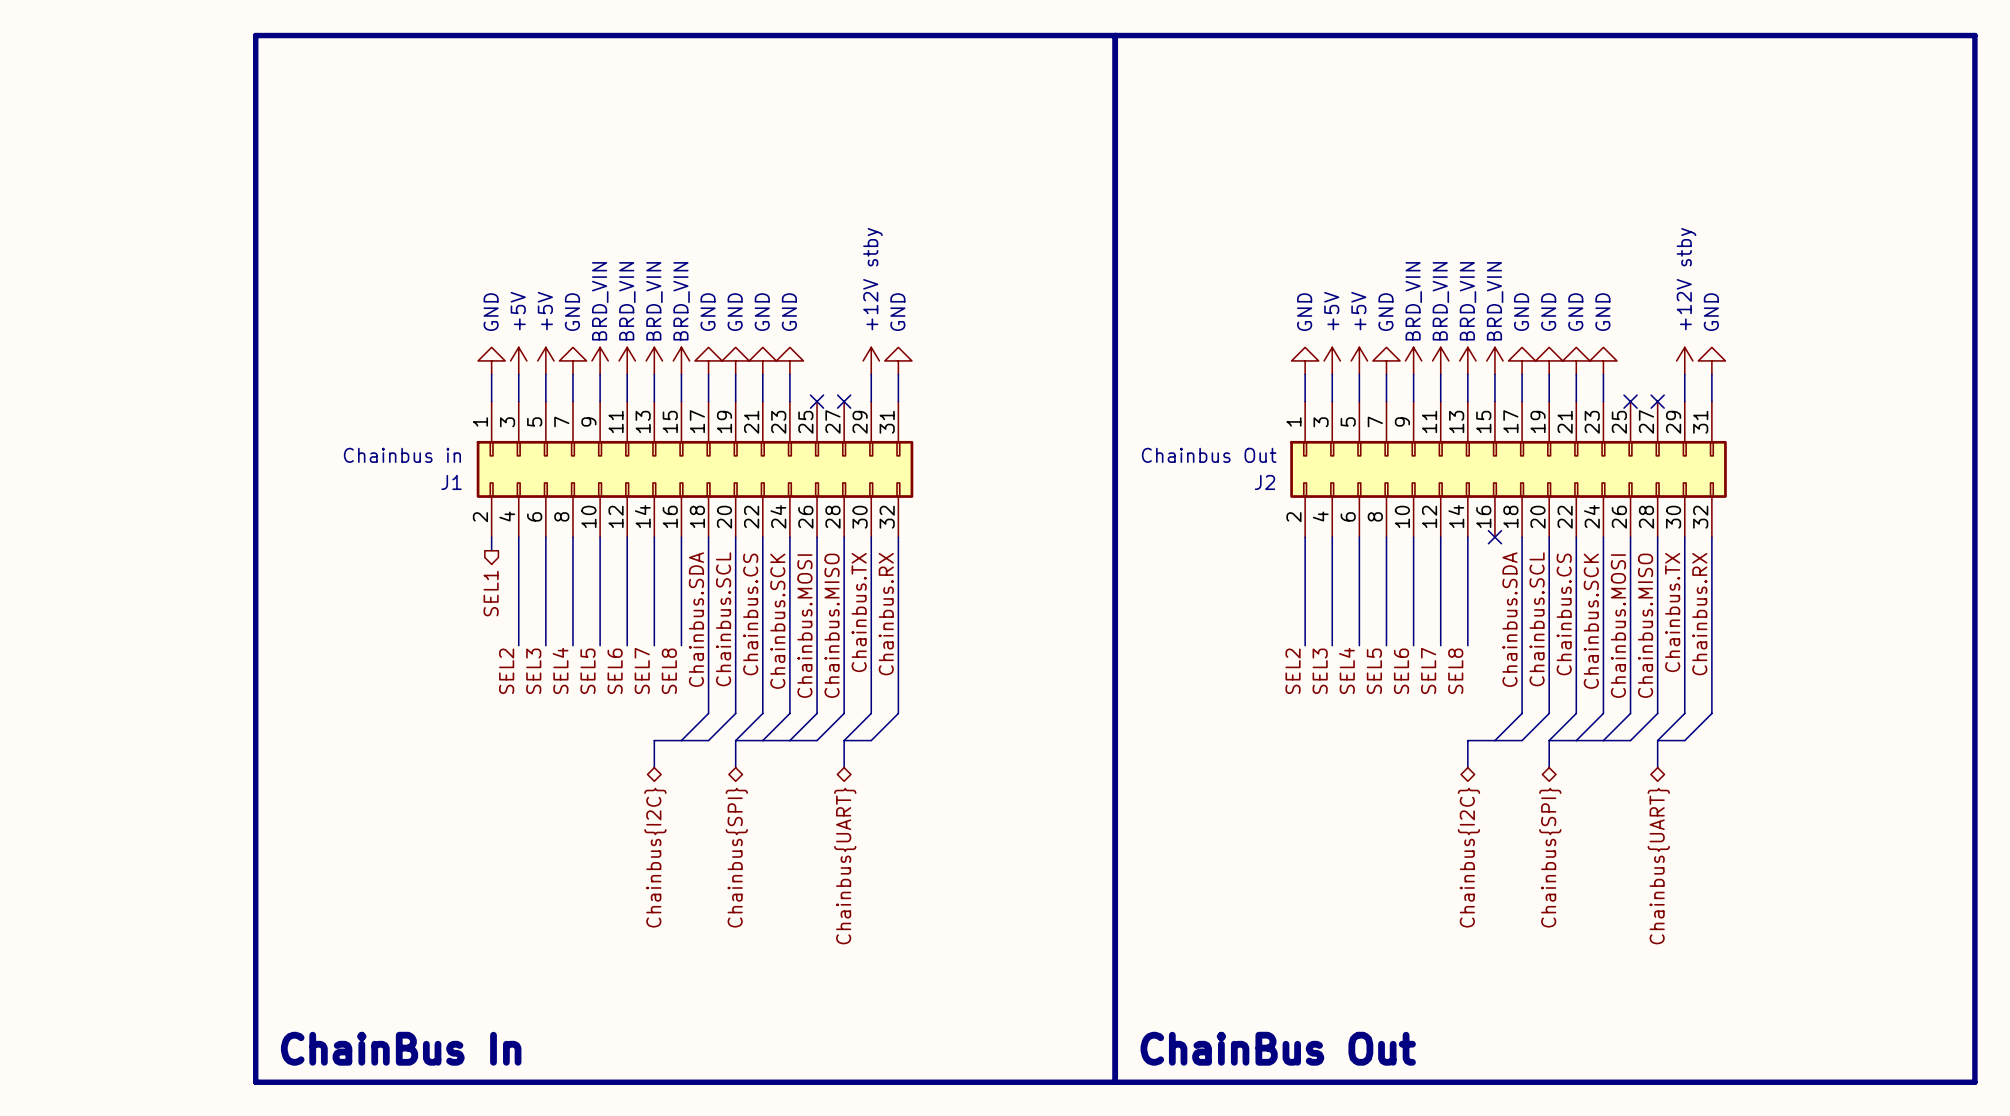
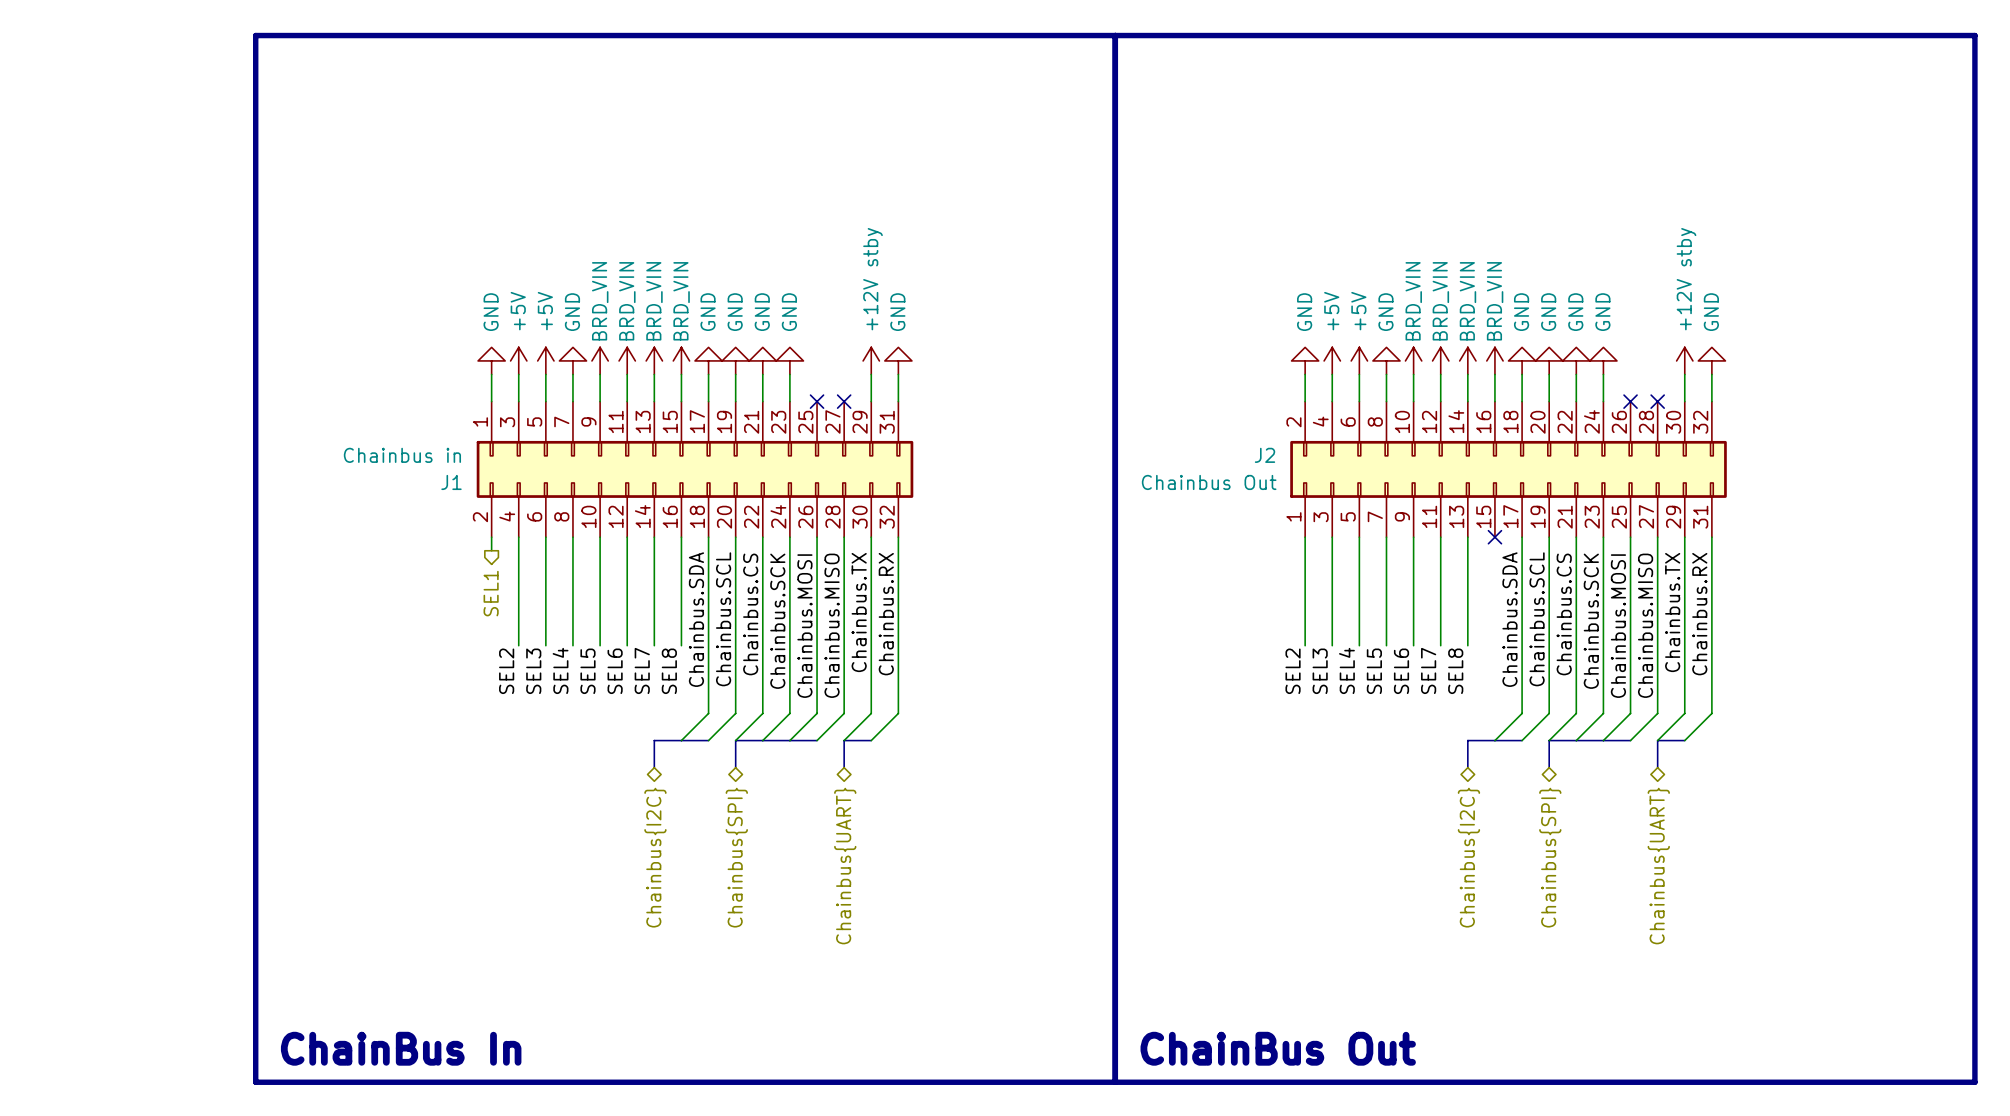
J2 flip: as is (1508, 469) -> up-down (1508, 469)

